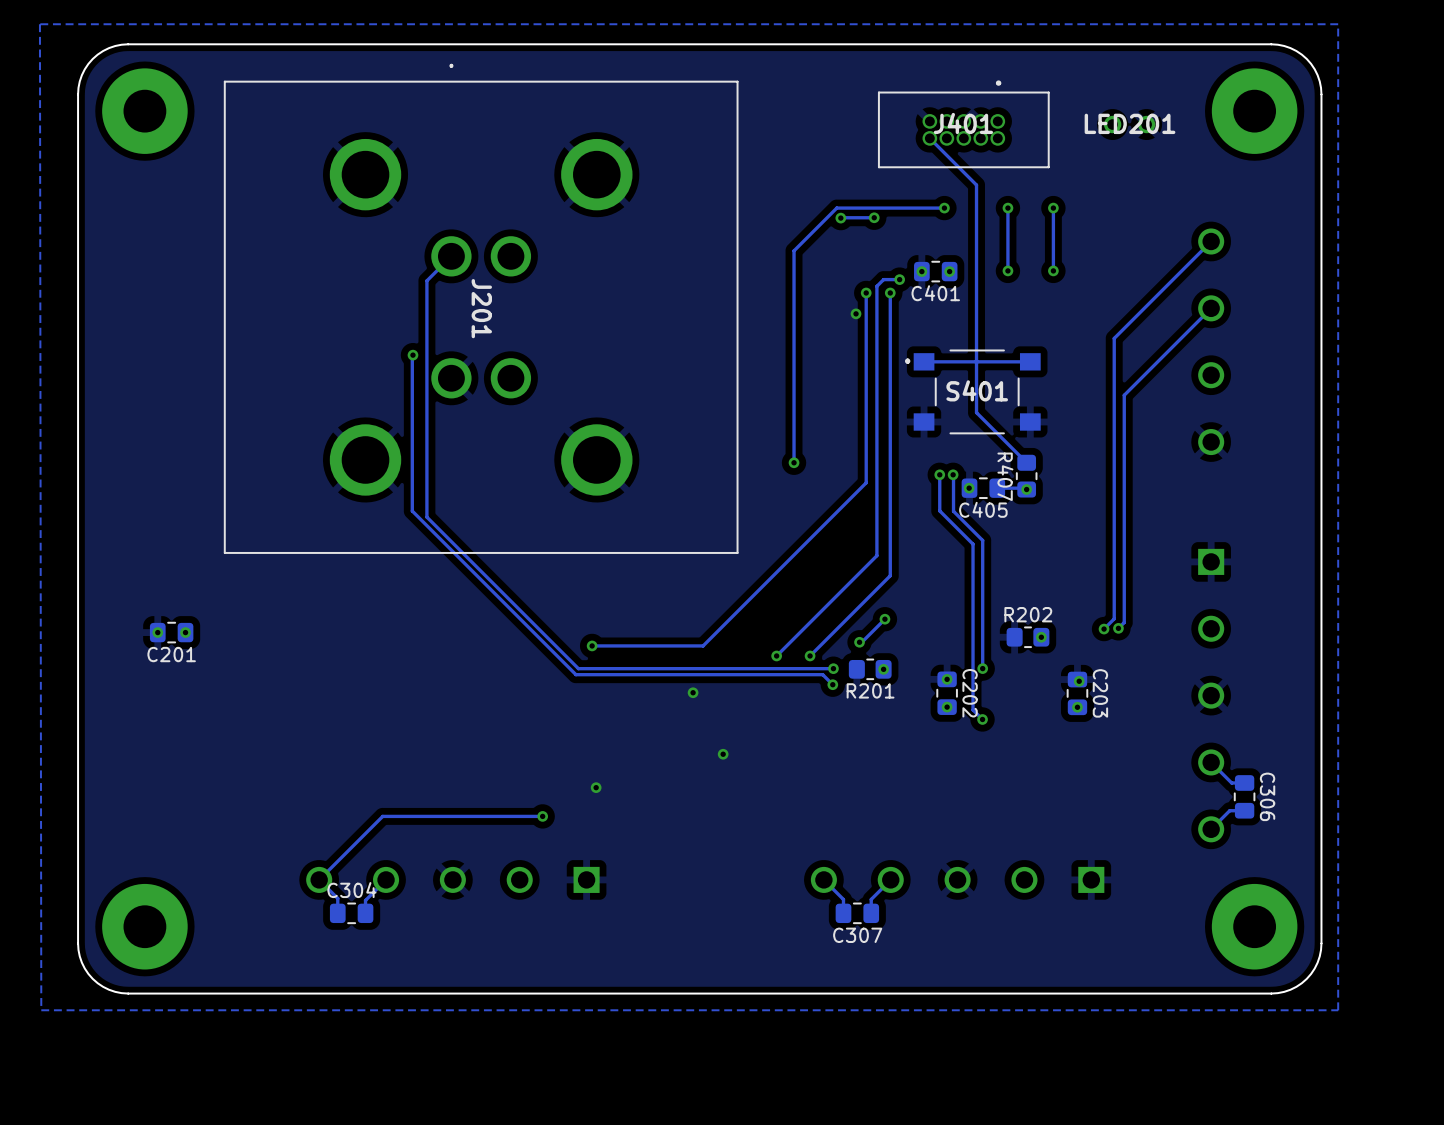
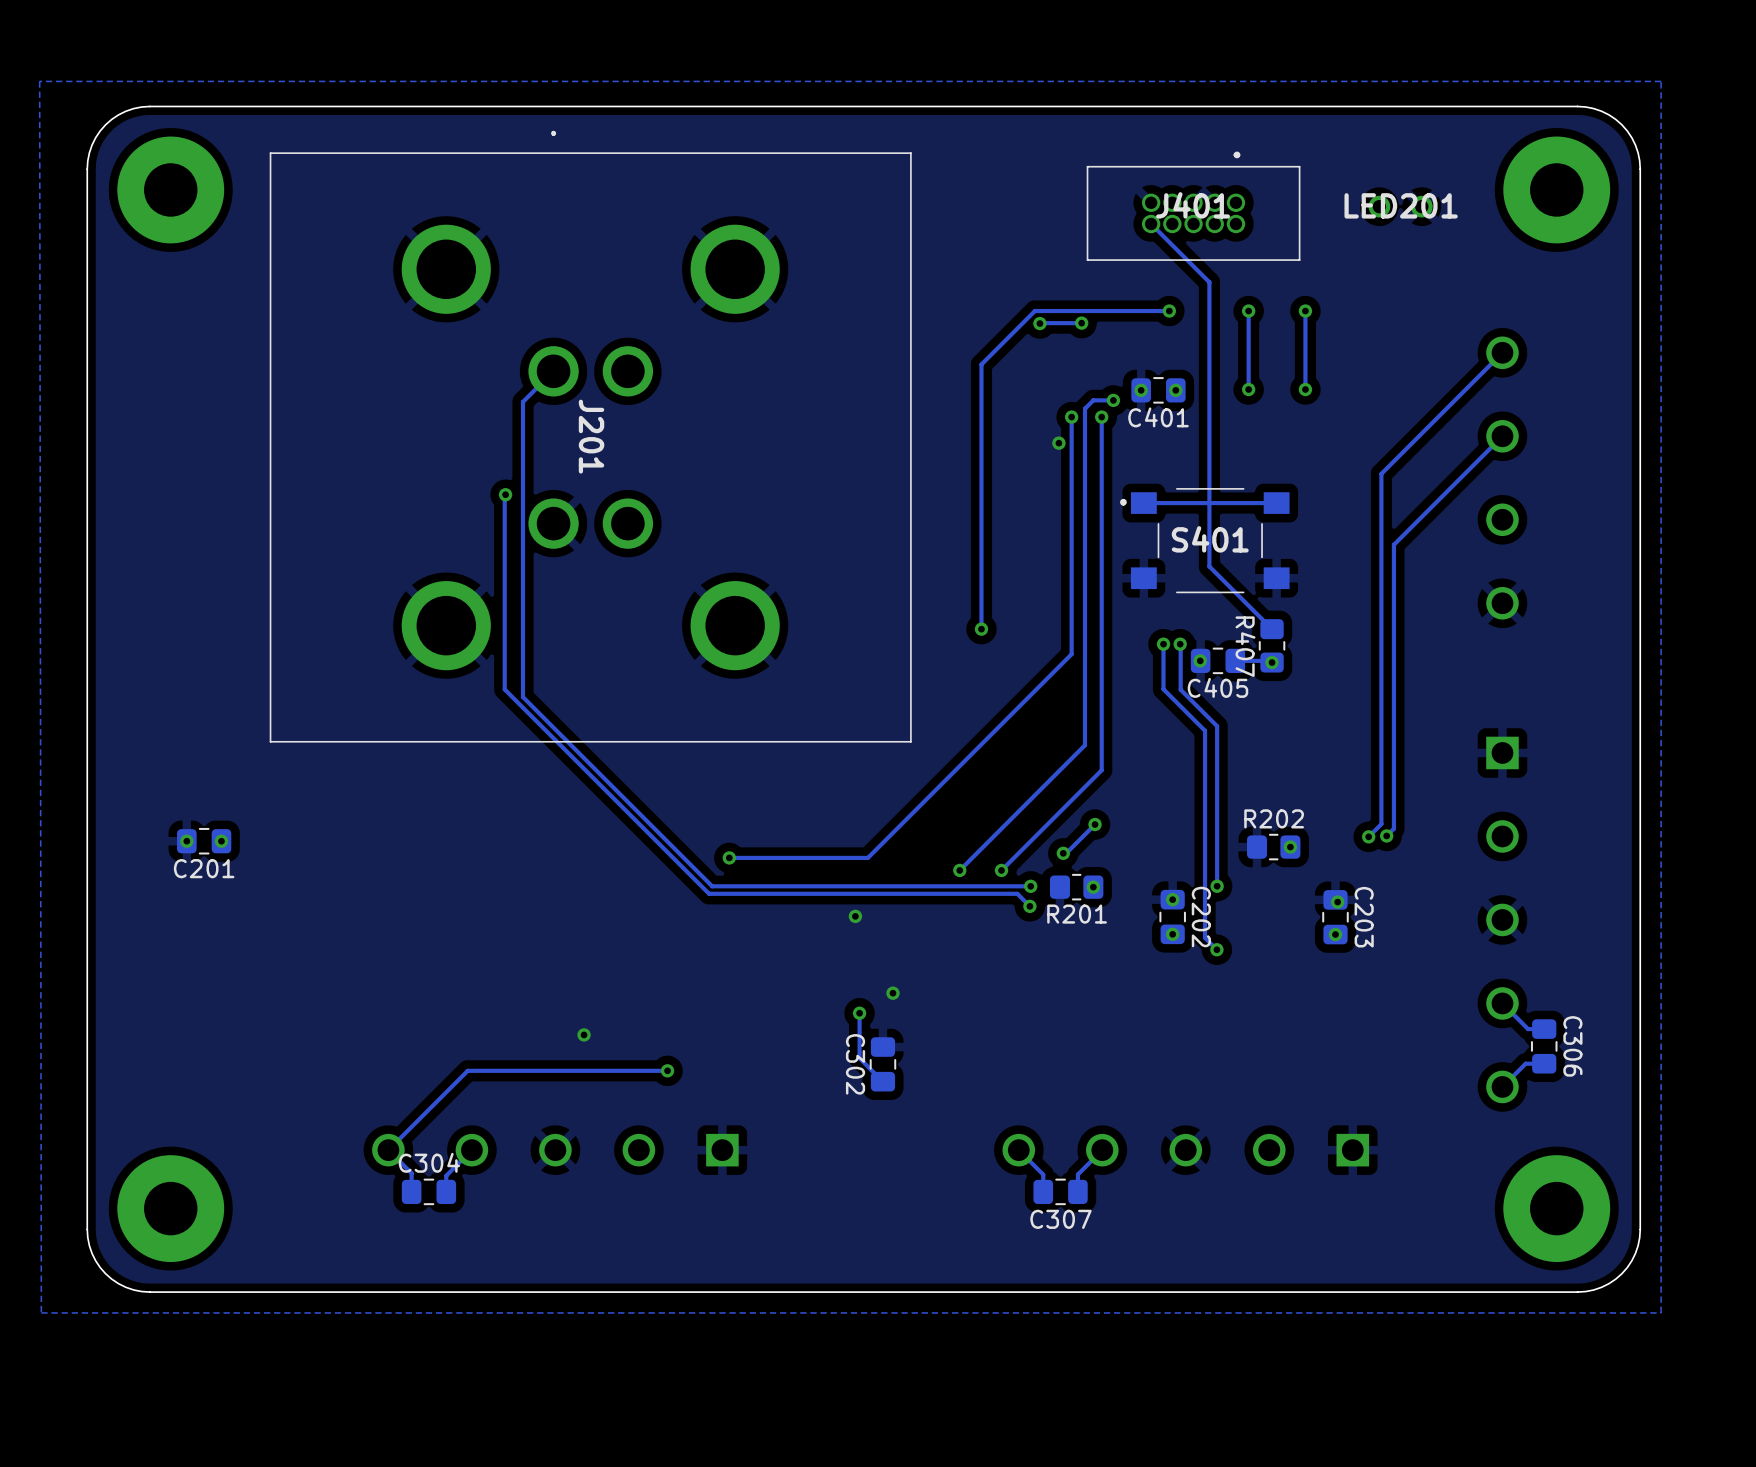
track: none -> (859, 1013) (859, 1058) (882, 1081)
via: none -> (859, 1013)
via: none -> (584, 1034)
via: (596, 787) -> none
C302: none -> (882, 1064)

